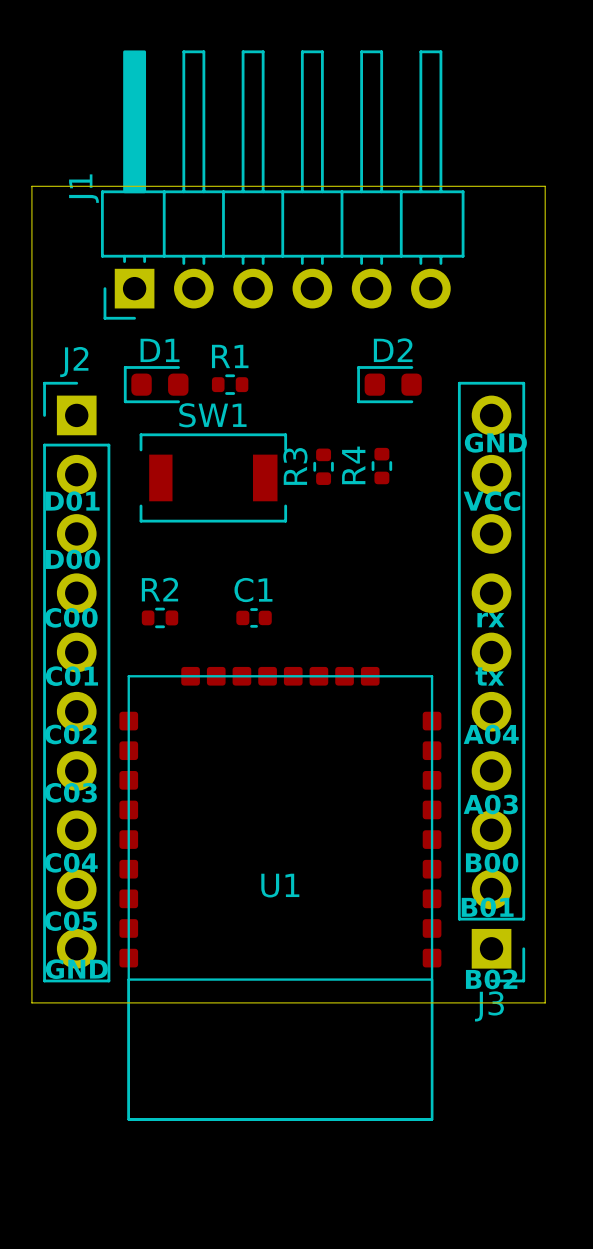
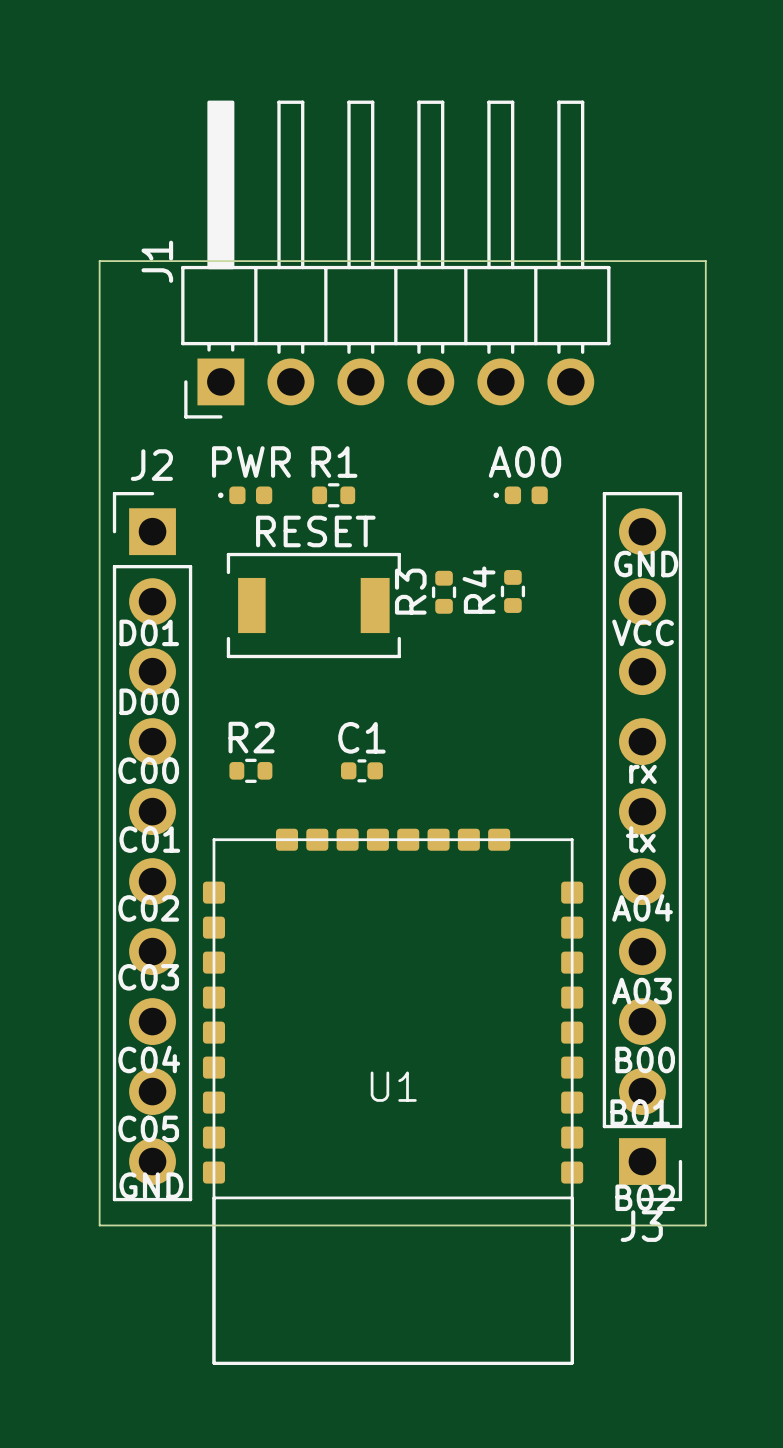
PWR: none -> (245, 495)
D1: (156, 384) -> none
A00: none -> (520, 495)
D2: (389, 384) -> none
SW1 name: SW1 (212, 415) -> RESET (315, 531)

